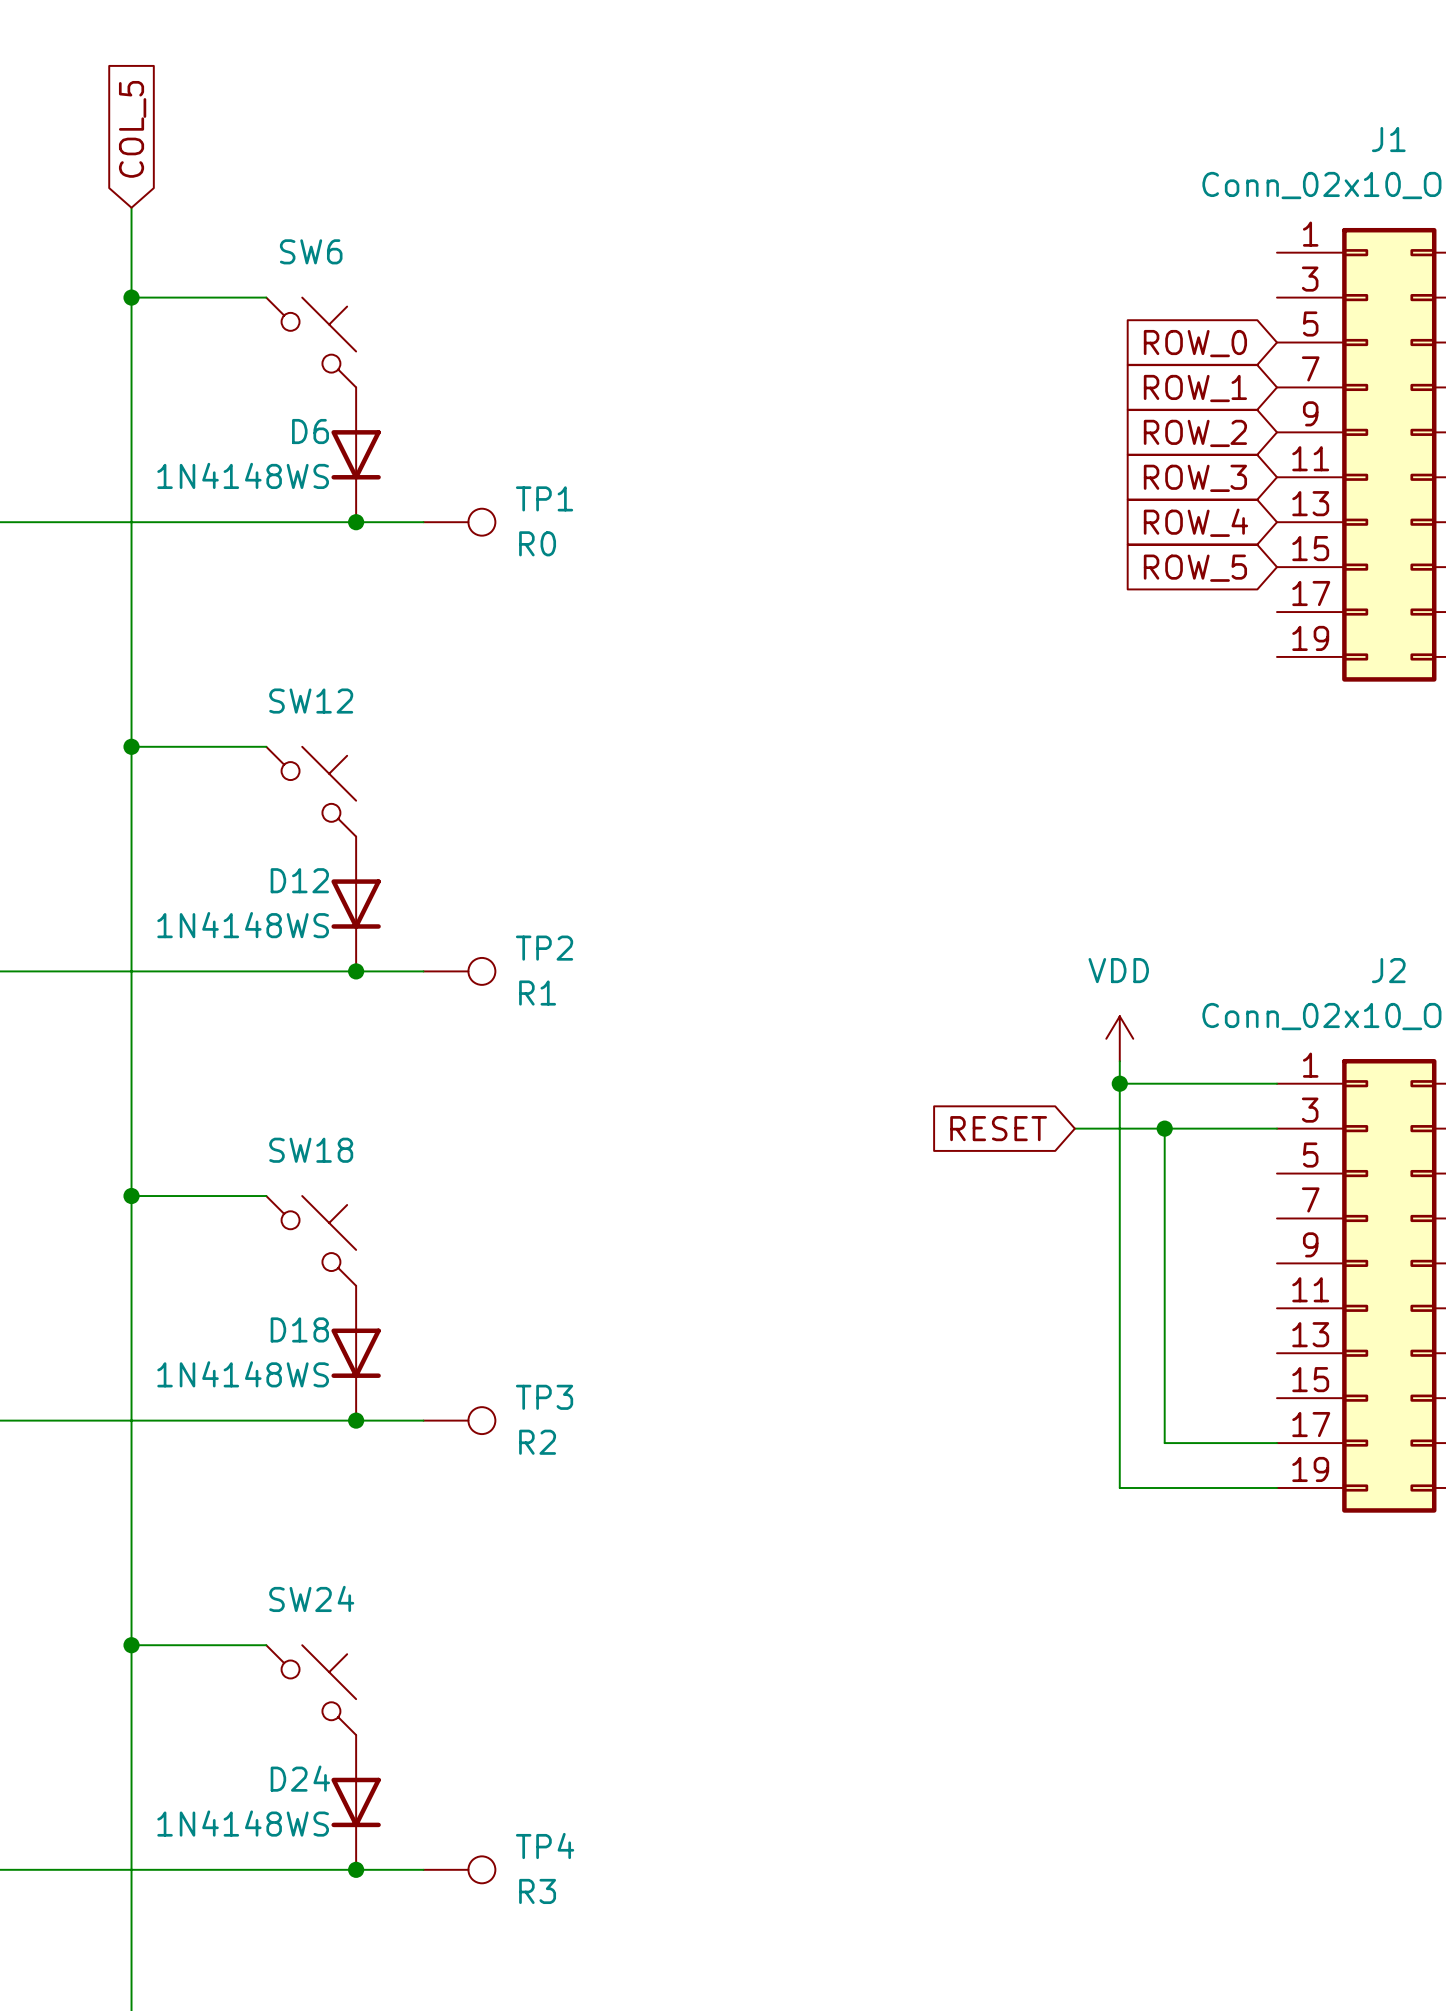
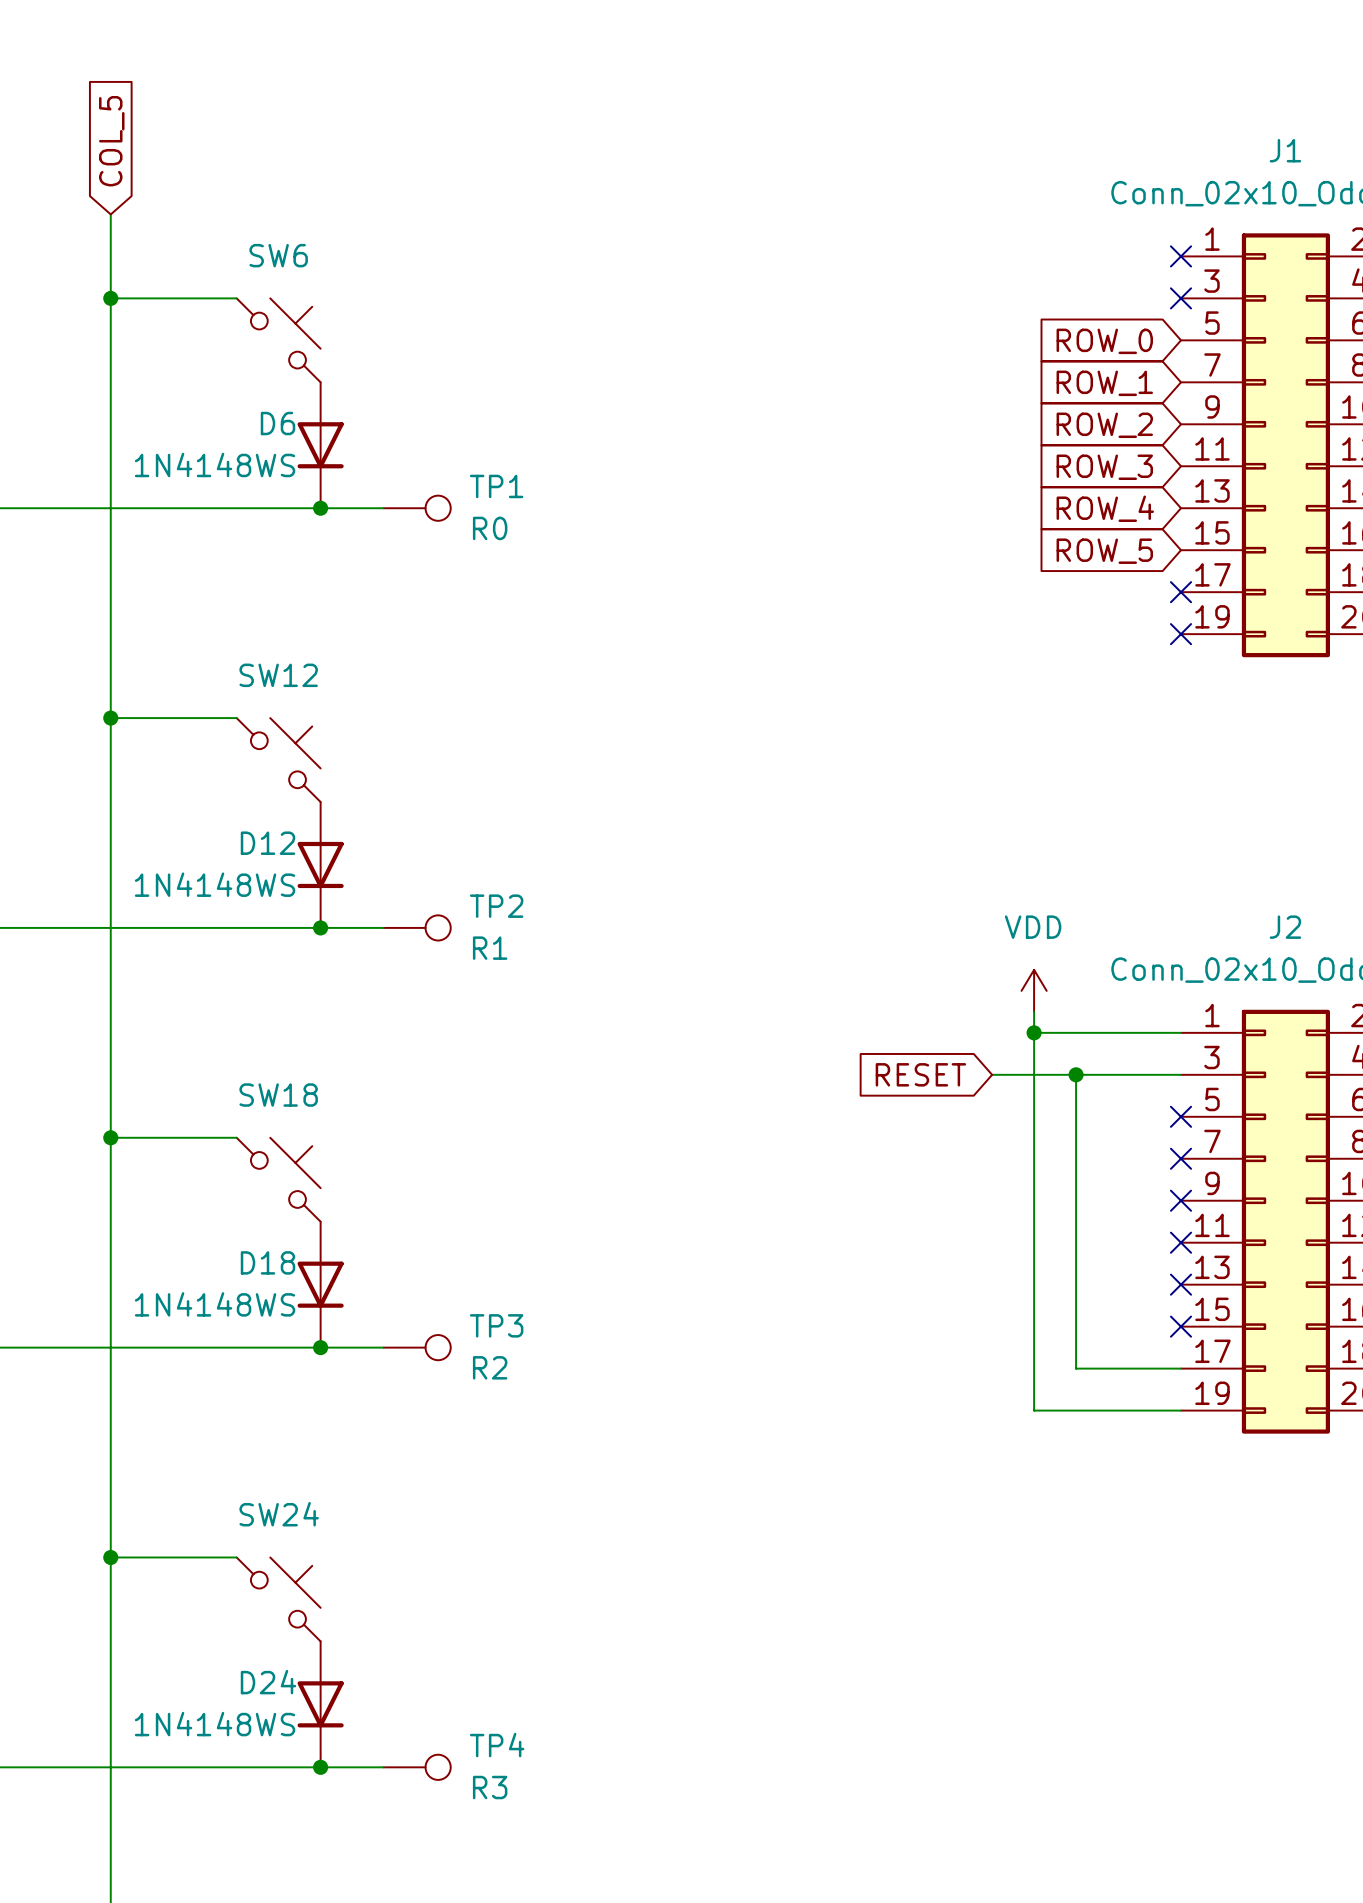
no-connect mark: none -> (1181, 256)
no-connect mark: none -> (1181, 298)
no-connect mark: none -> (1181, 592)
no-connect mark: none -> (1181, 634)
no-connect mark: none -> (1181, 1116)
no-connect mark: none -> (1181, 1158)
no-connect mark: none -> (1181, 1200)
no-connect mark: none -> (1181, 1242)
no-connect mark: none -> (1181, 1284)
no-connect mark: none -> (1181, 1326)

